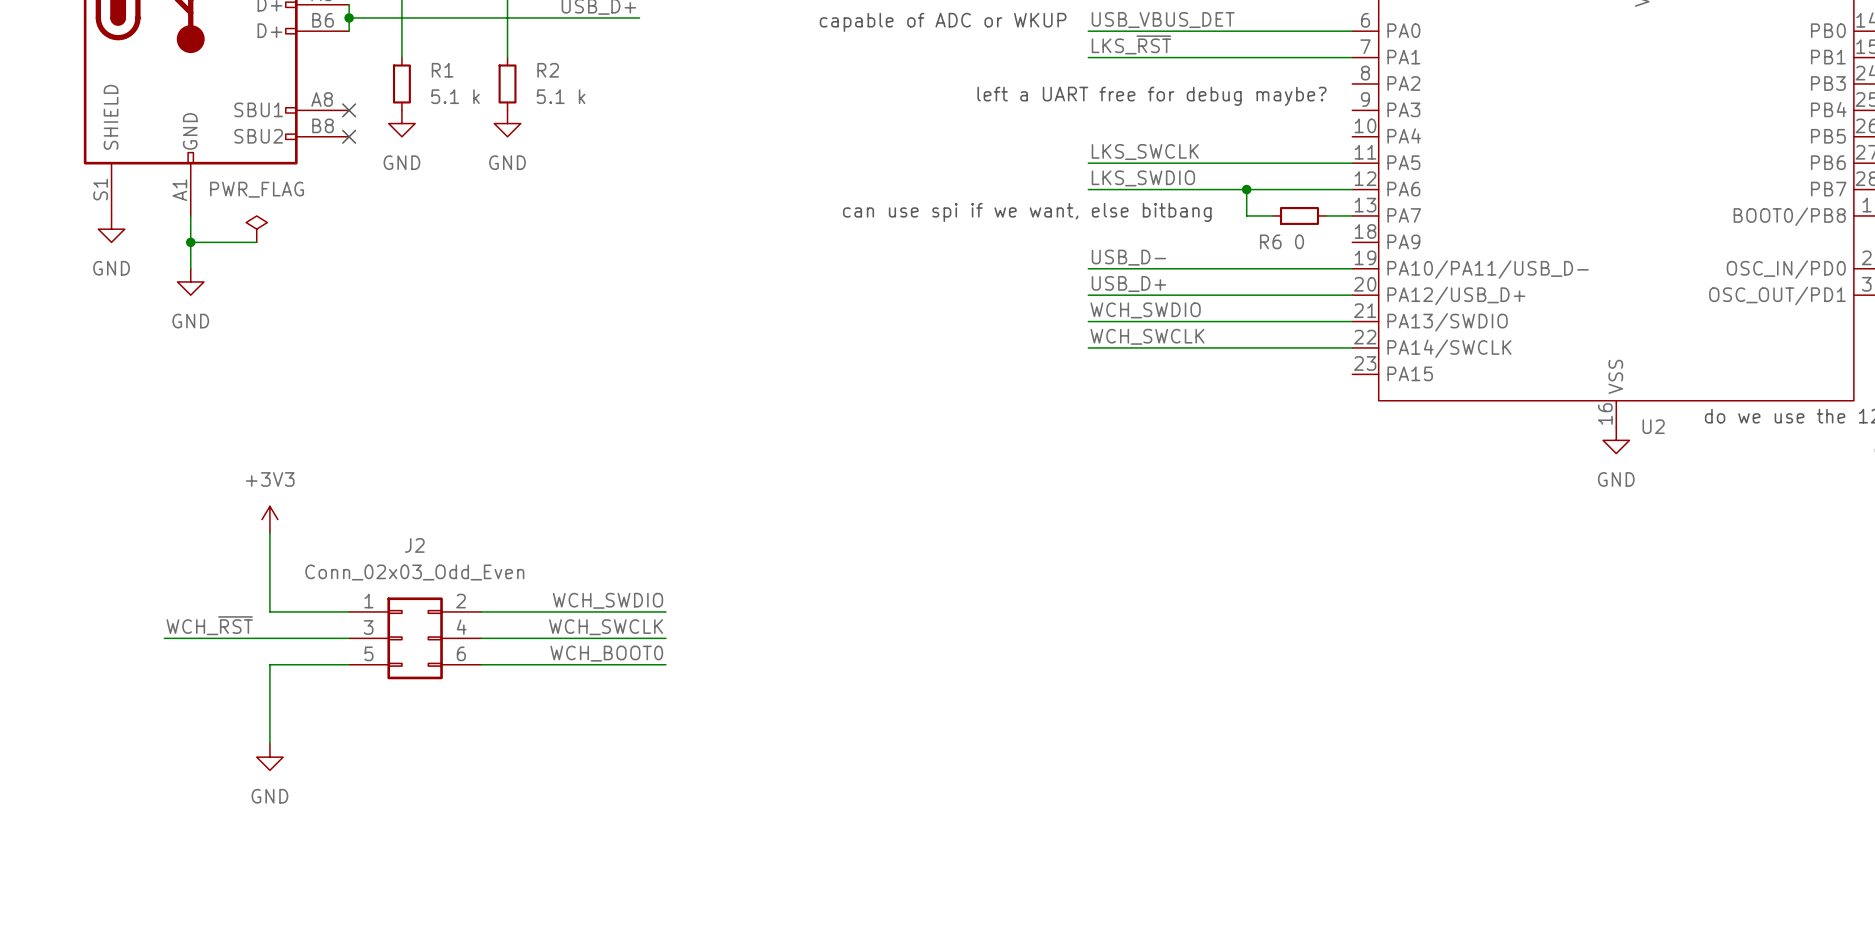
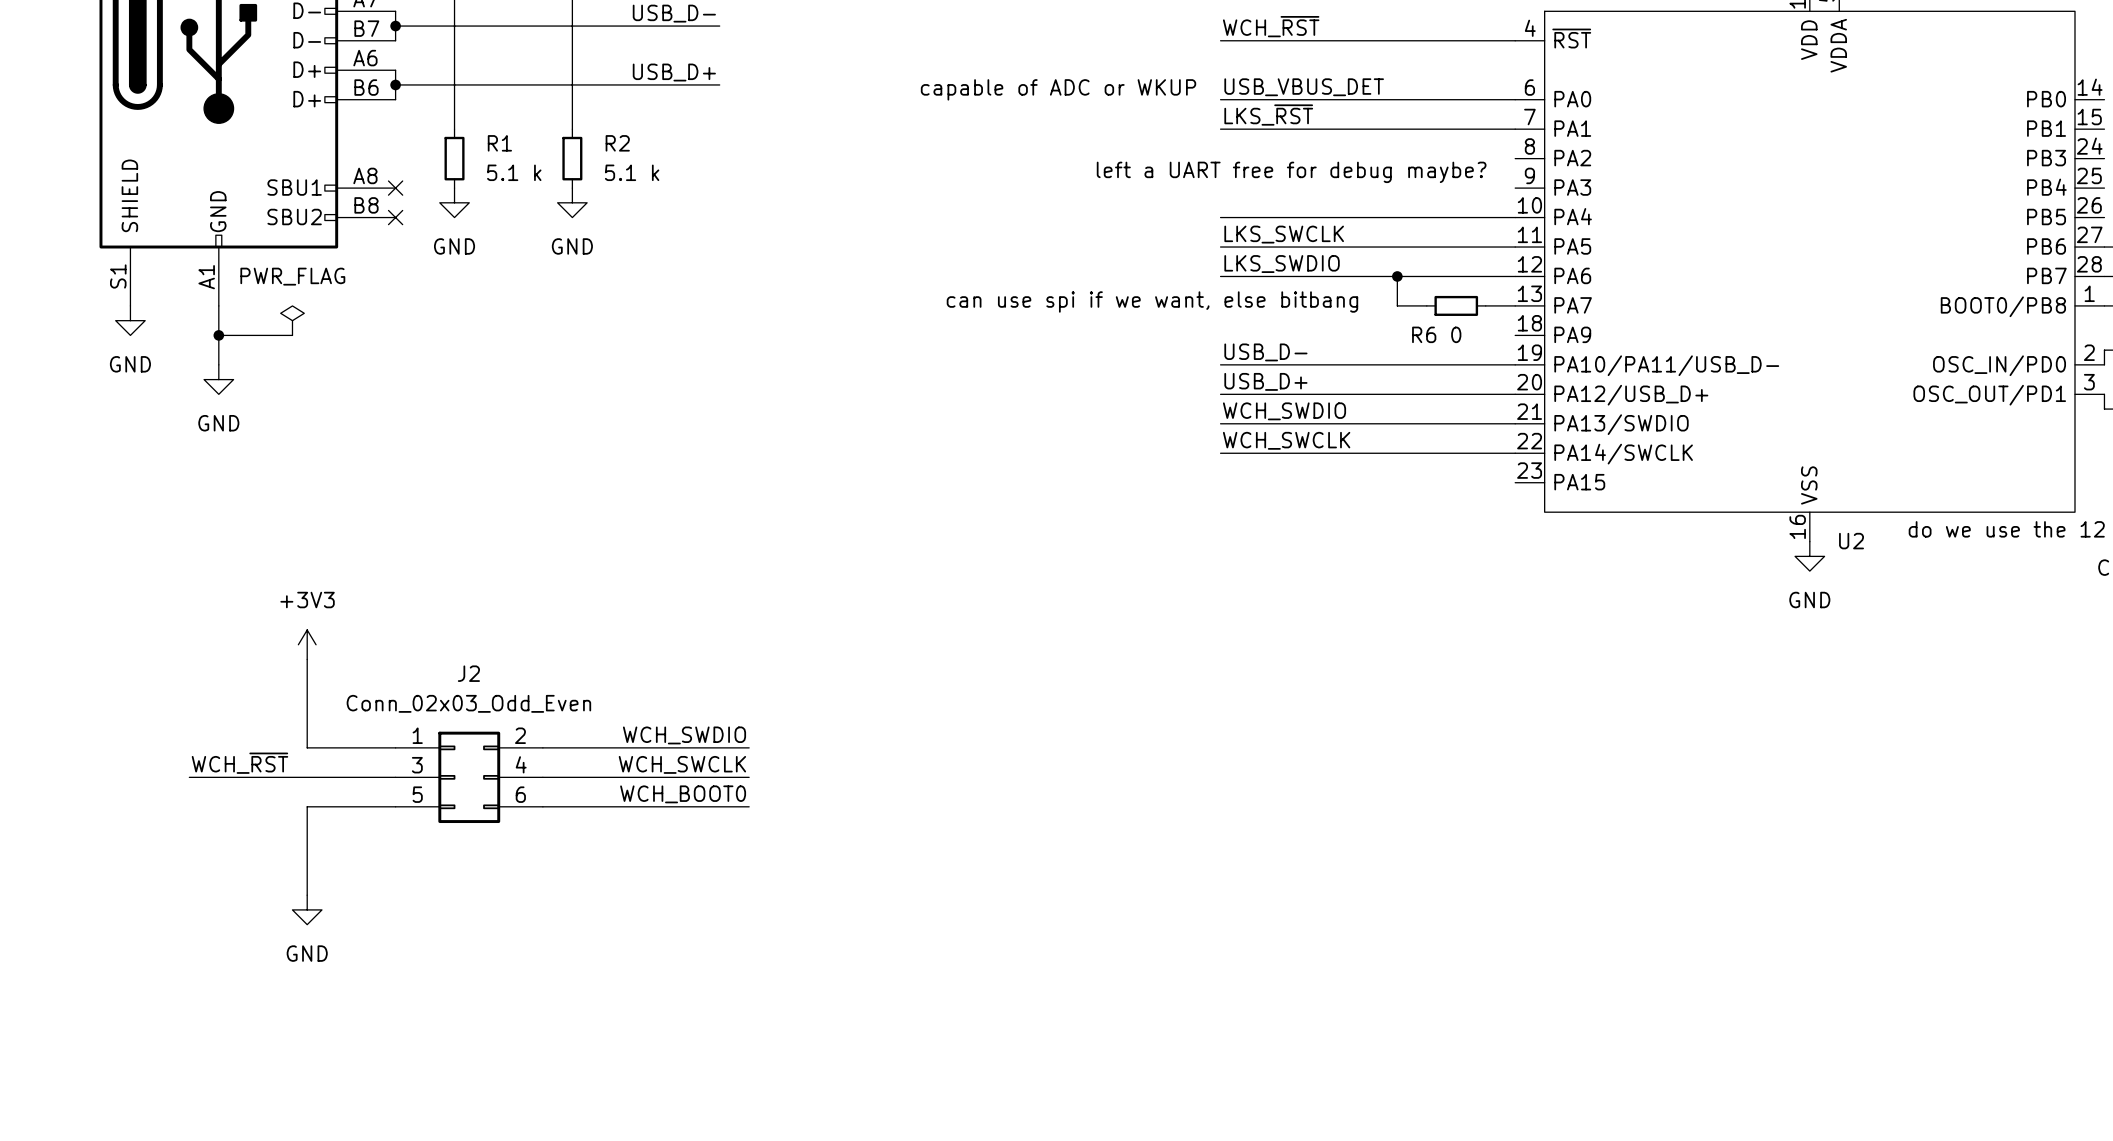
wire: none -> (1220, 217) (1515, 217)

